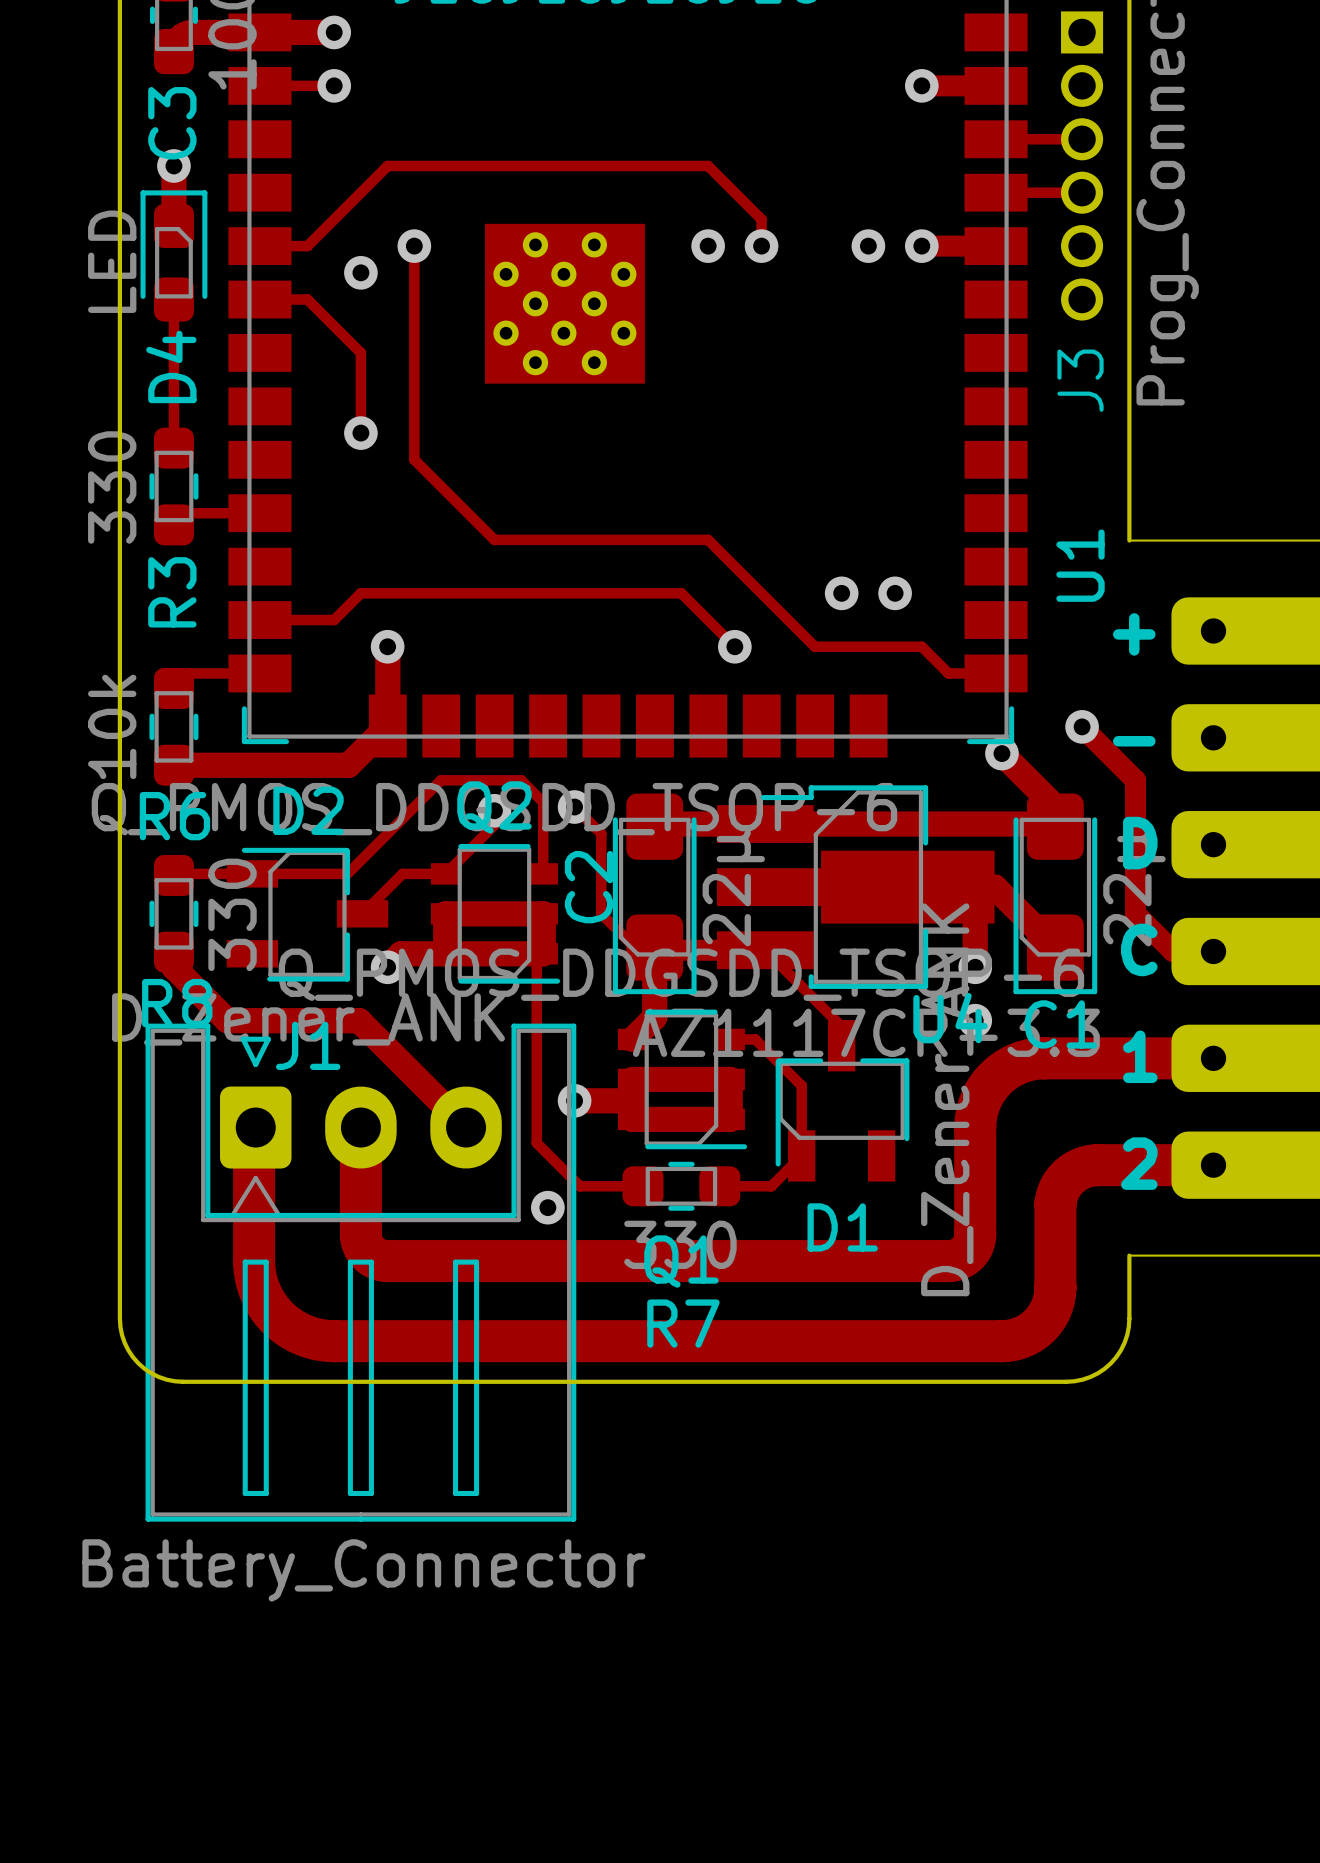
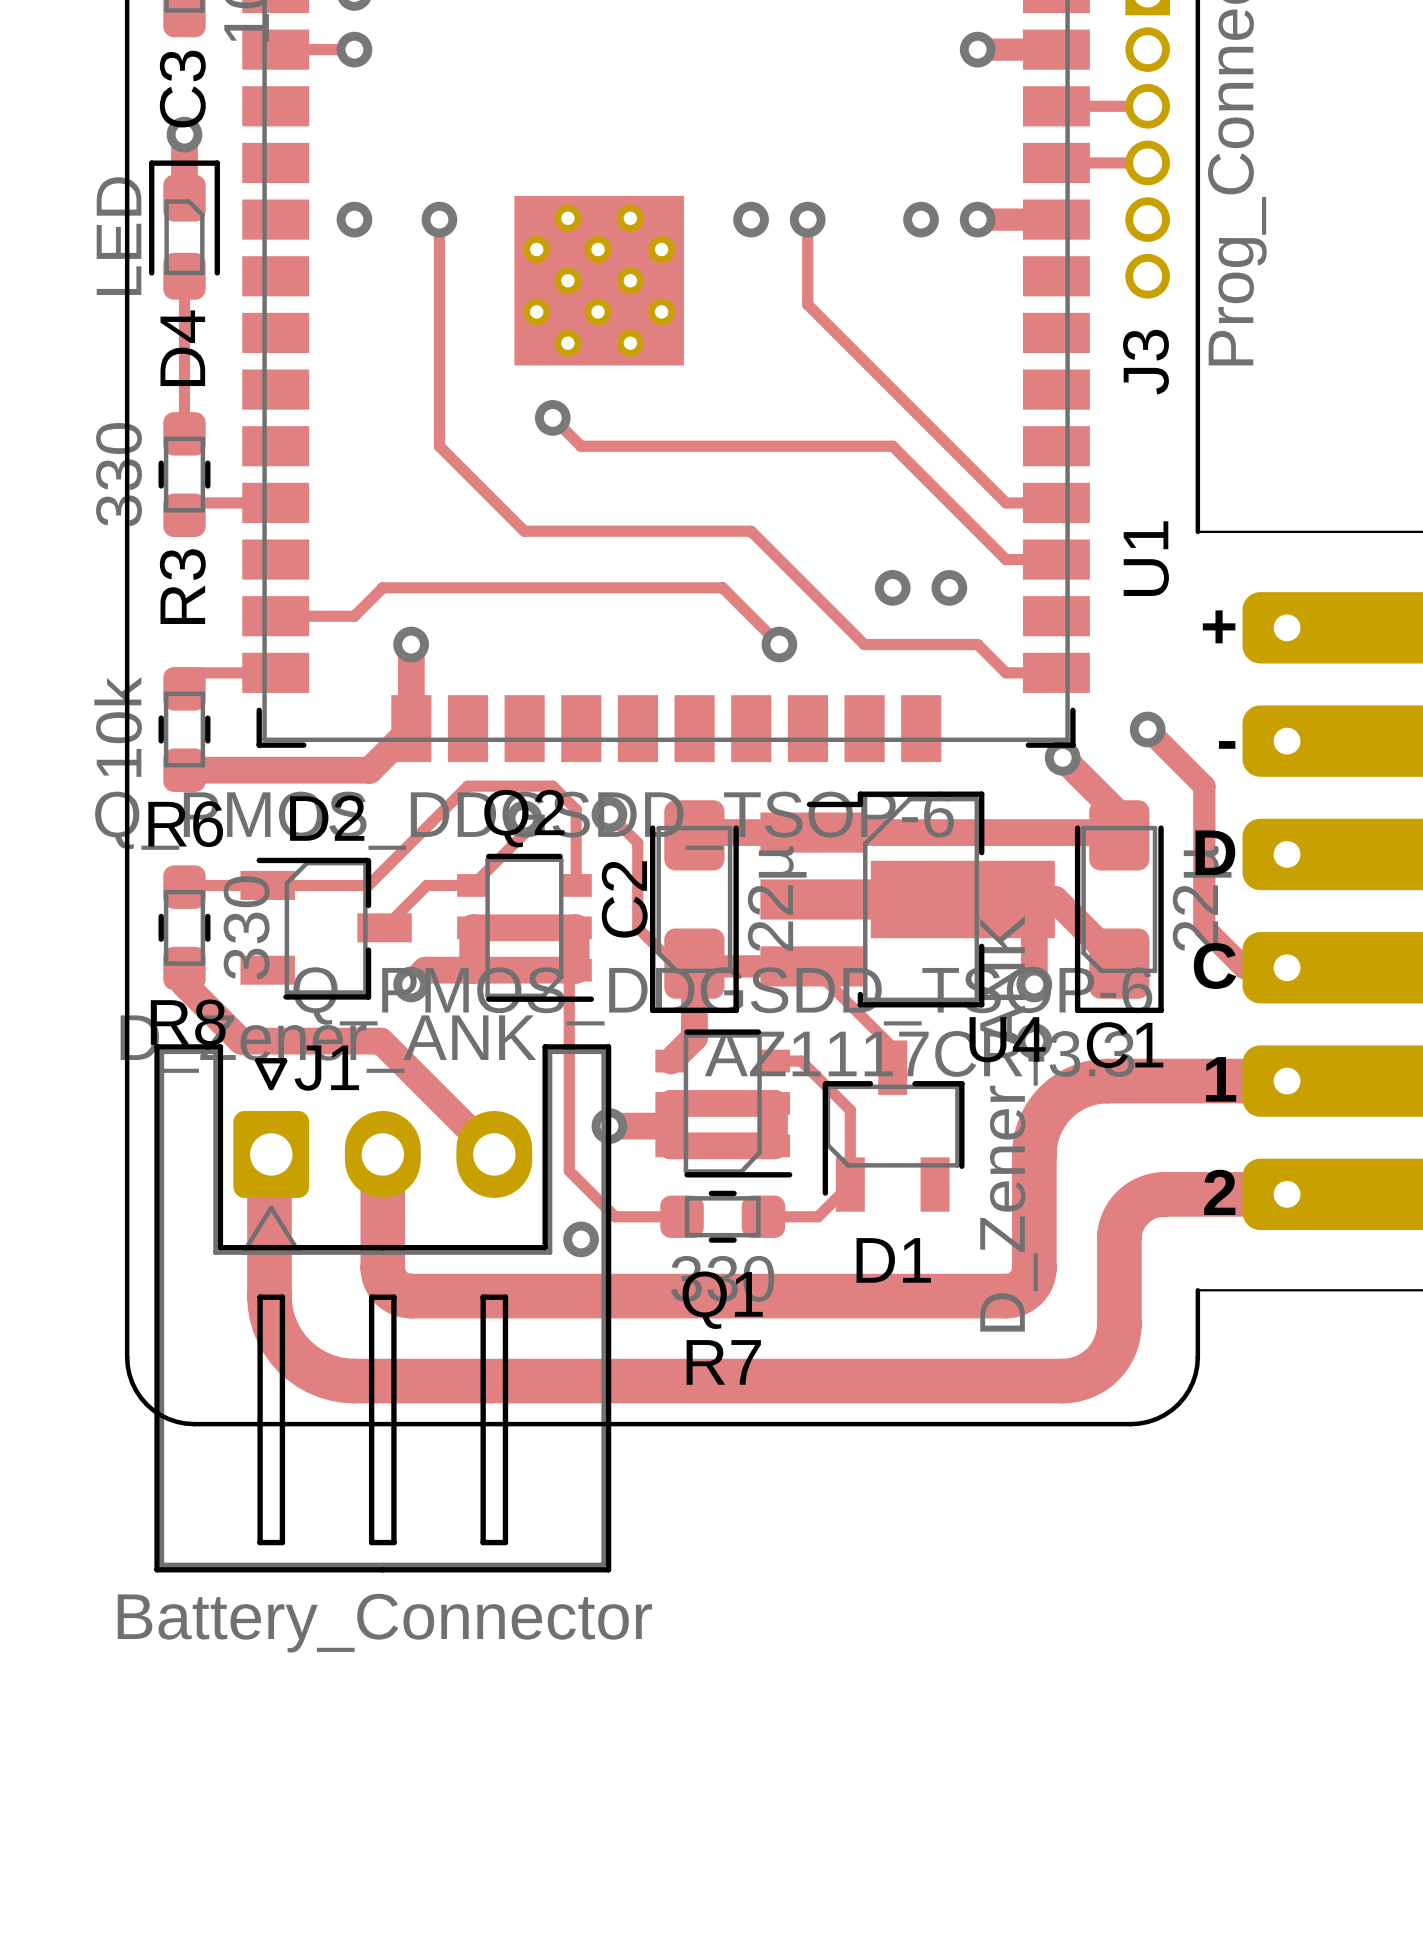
track: (259, 246) (307, 246) (387, 165) (708, 165) (761, 219) (761, 246) -> (1056, 502) (1006, 502) (807, 304) (807, 219)
via position: (360, 272) -> (354, 219)
track: (259, 299) (307, 299) (360, 352) (360, 433) -> none
via: (360, 433) -> none
track: none -> (552, 417) (581, 446) (892, 446) (1006, 559) (1056, 559)
via: none -> (552, 417)

